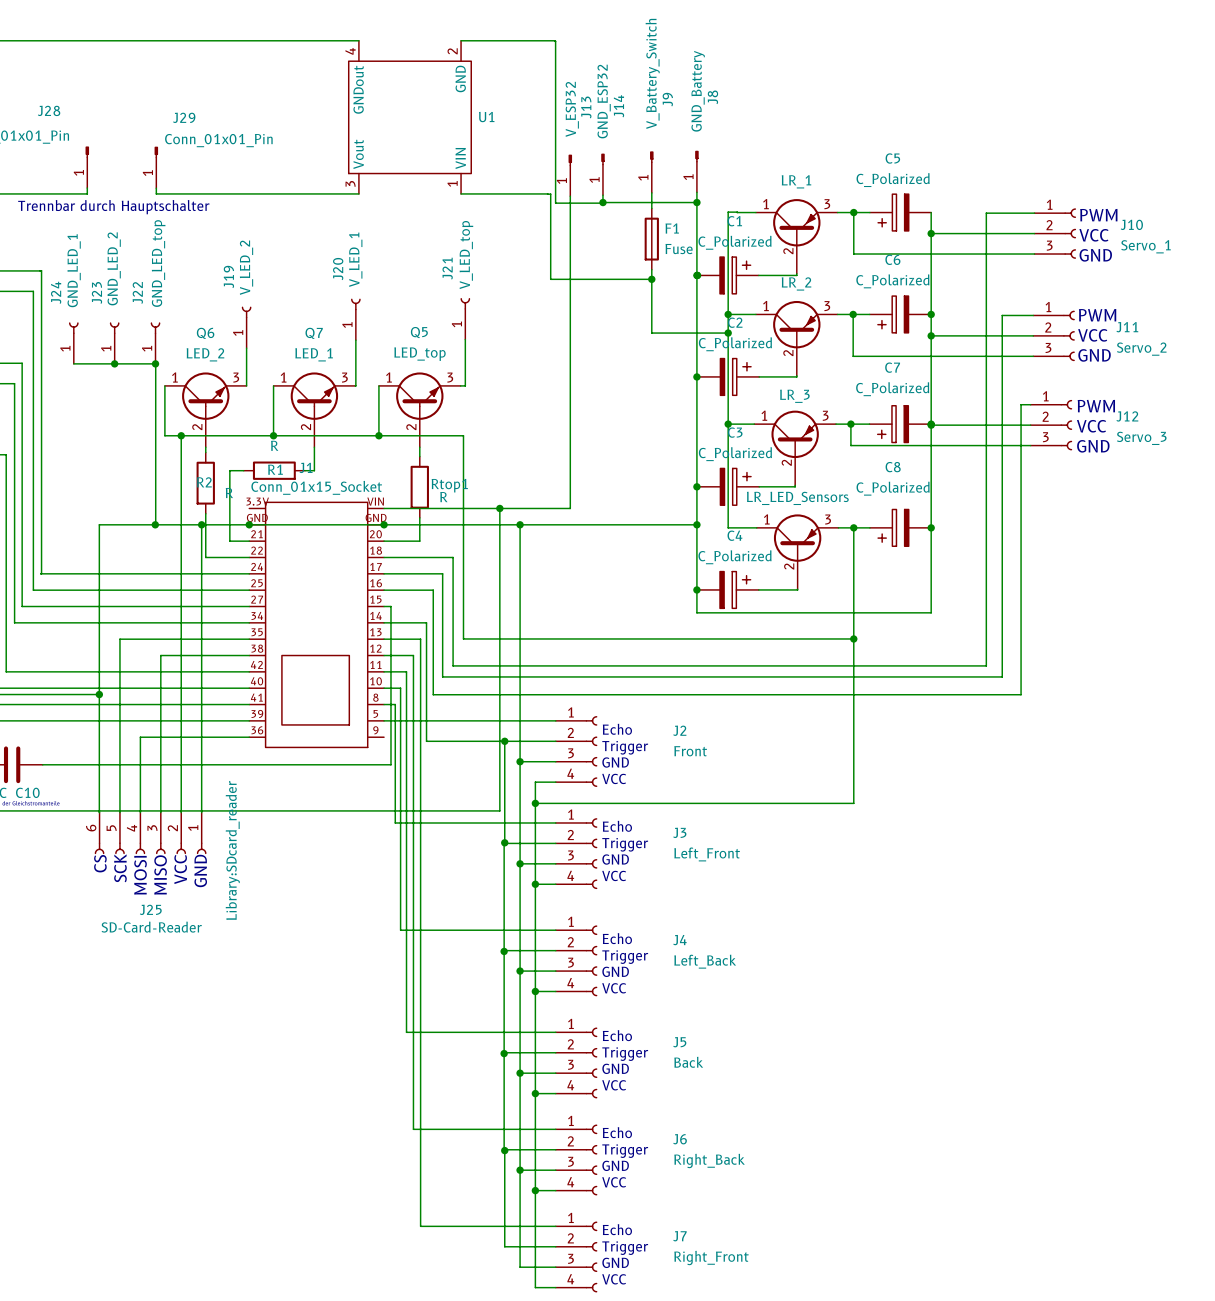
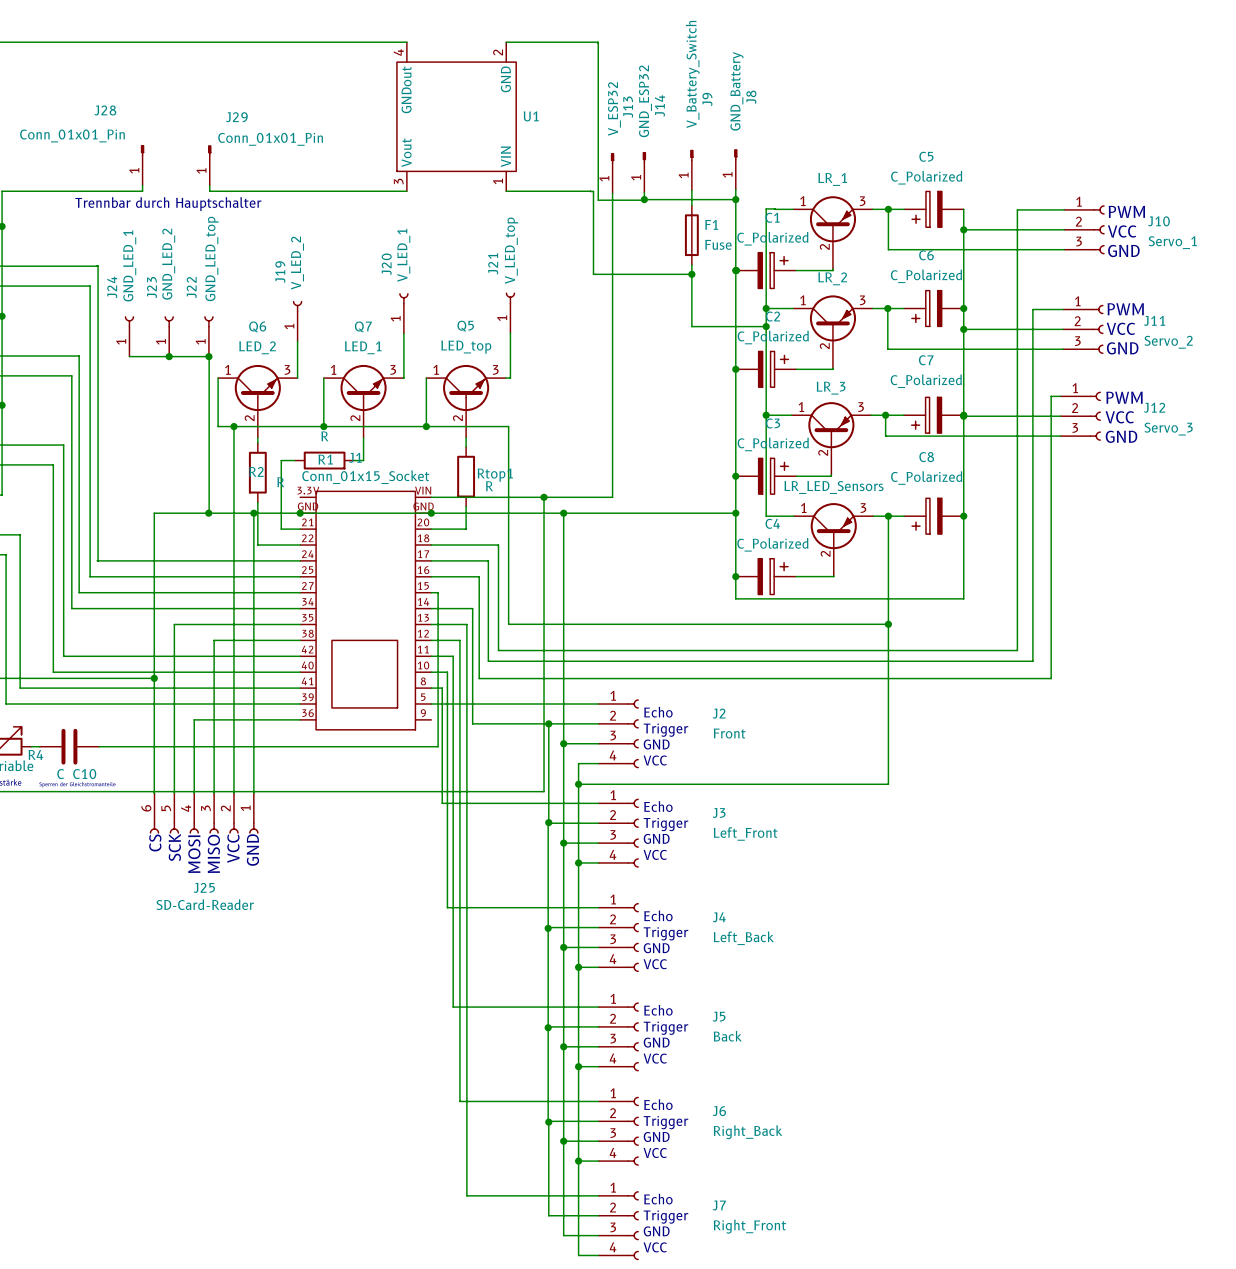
J25 text: Library:SDcard_reader (232, 850) -> none

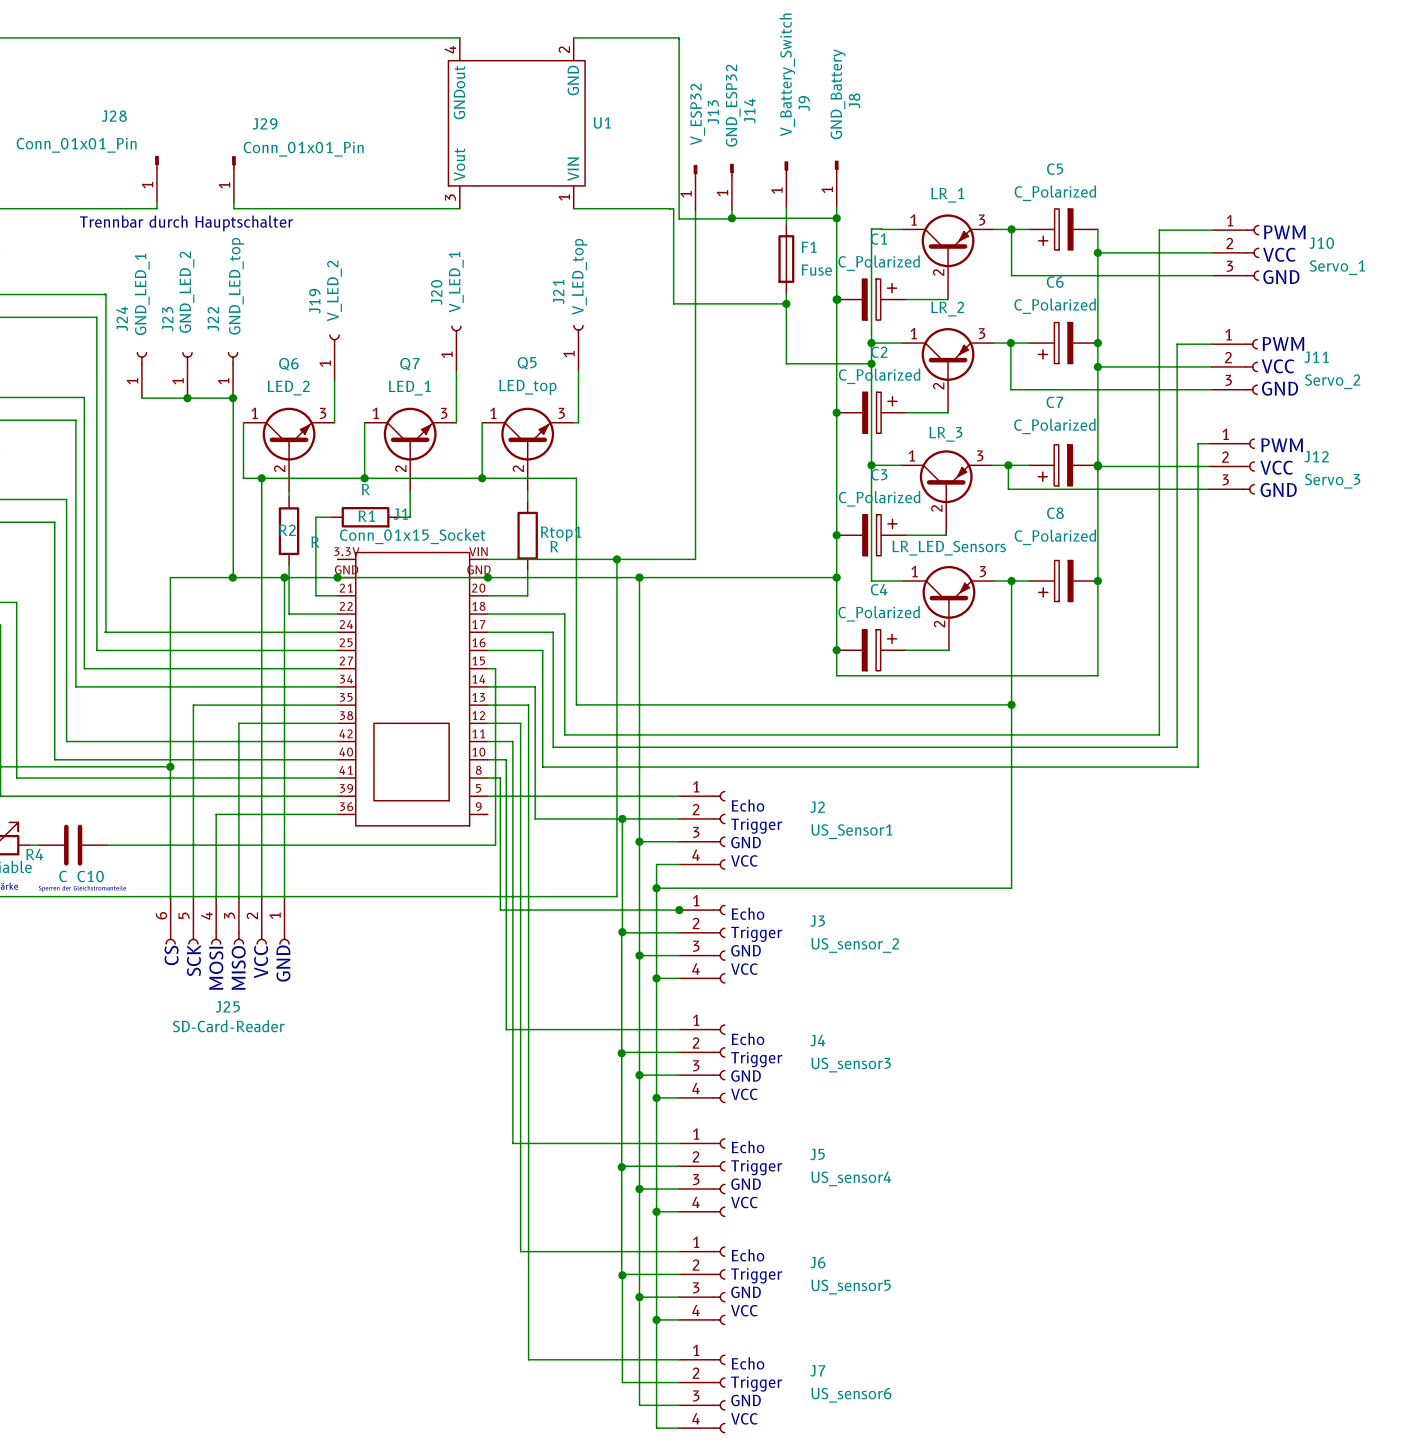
J2 value: Front (729, 733) -> US_Sensor1 (851, 831)
junction: none -> (679, 910)
J3 value: Left_Front (745, 833) -> US_sensor_2 (855, 945)
J4 value: Left_Back (743, 938) -> US_sensor3 (851, 1065)
J5 value: Back (727, 1036) -> US_sensor4 (851, 1178)
J6 value: Right_Back (748, 1132) -> US_sensor5 (851, 1287)
J7 value: Right_Front (749, 1226) -> US_sensor6 (851, 1395)

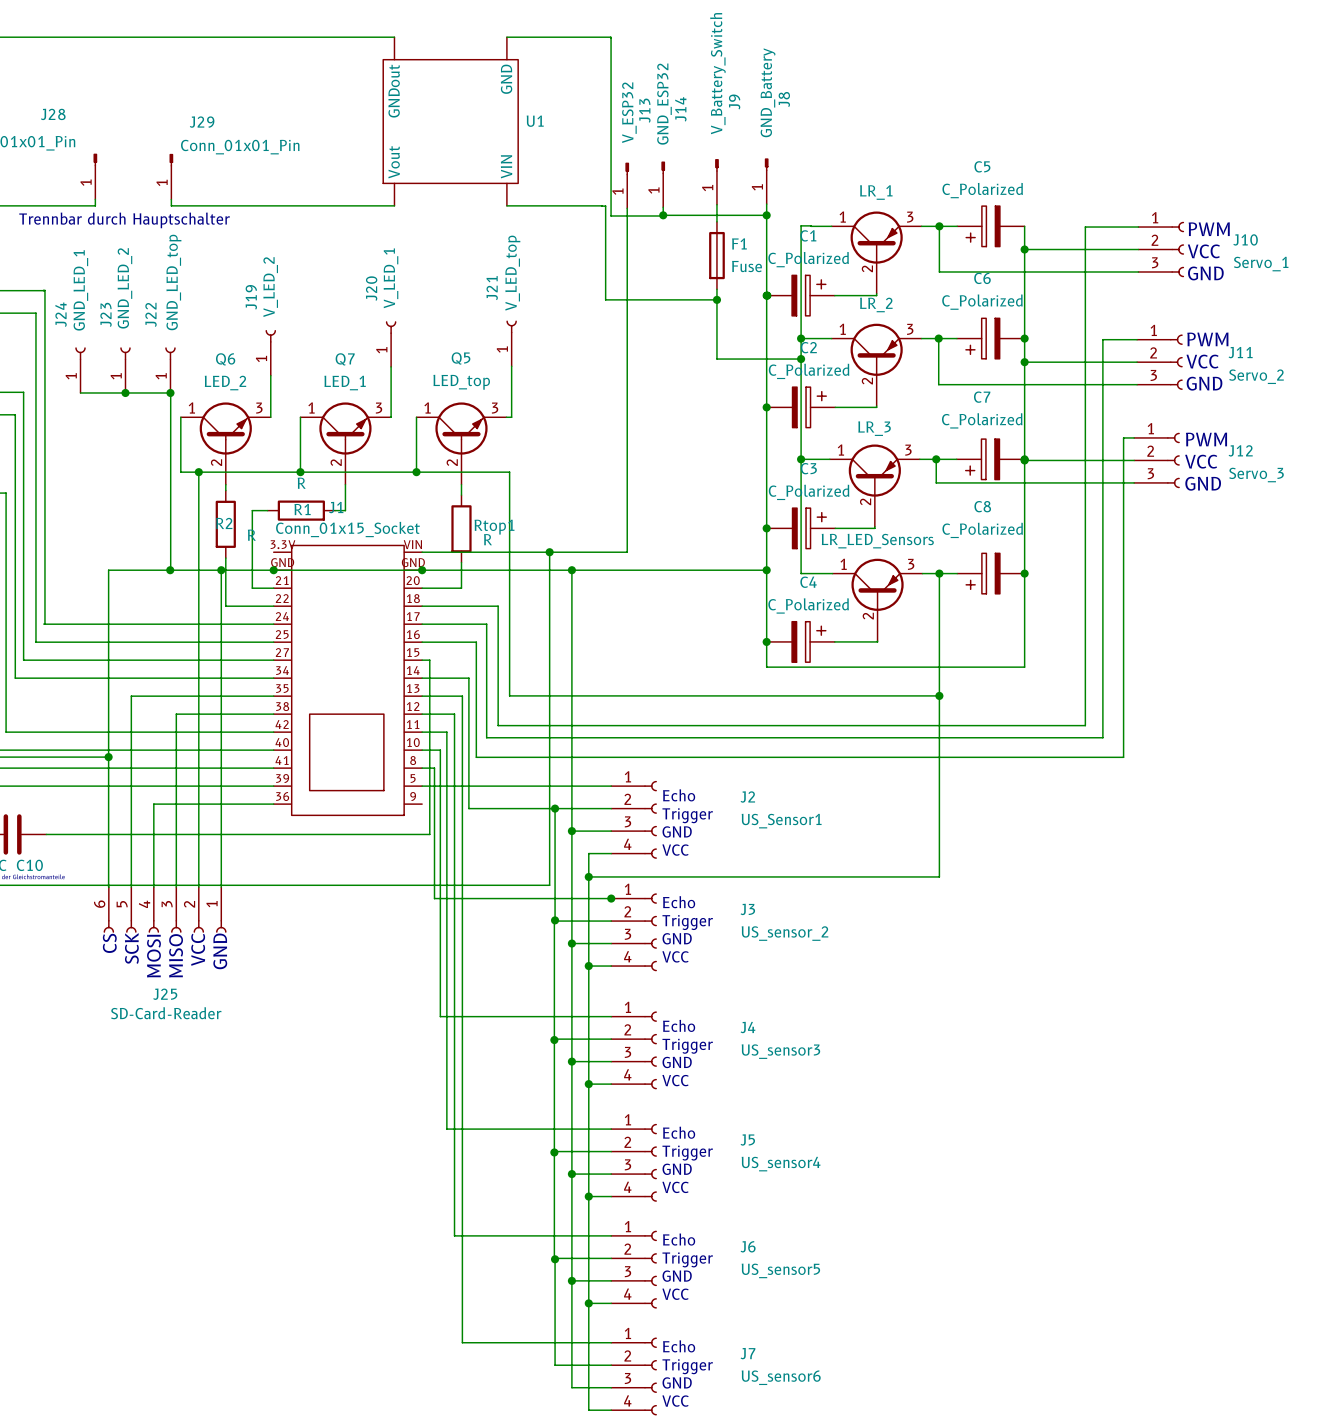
U1 pin number: 4 (450, 49) -> none
U1 pin number: 2 (564, 49) -> none
U1 pin number: 3 (450, 197) -> none
U1 pin number: 1 (564, 197) -> none

